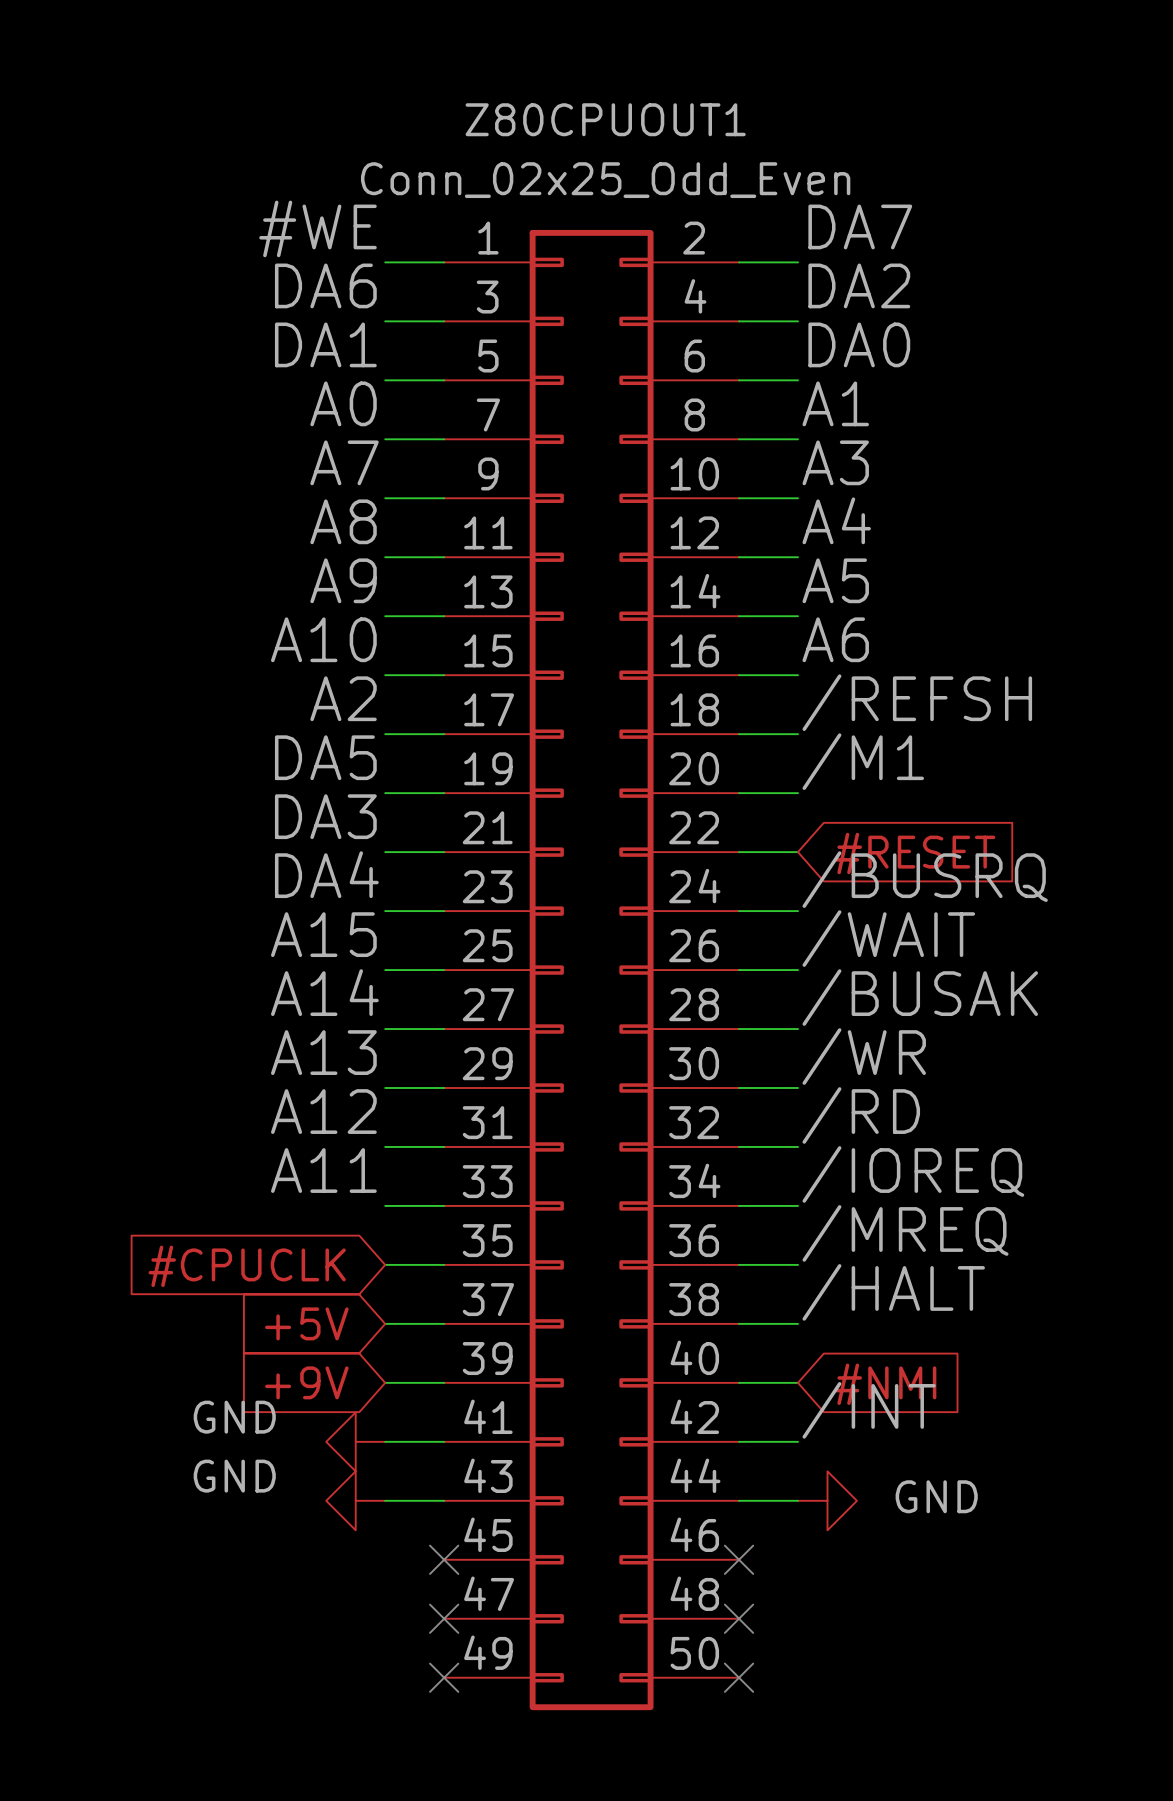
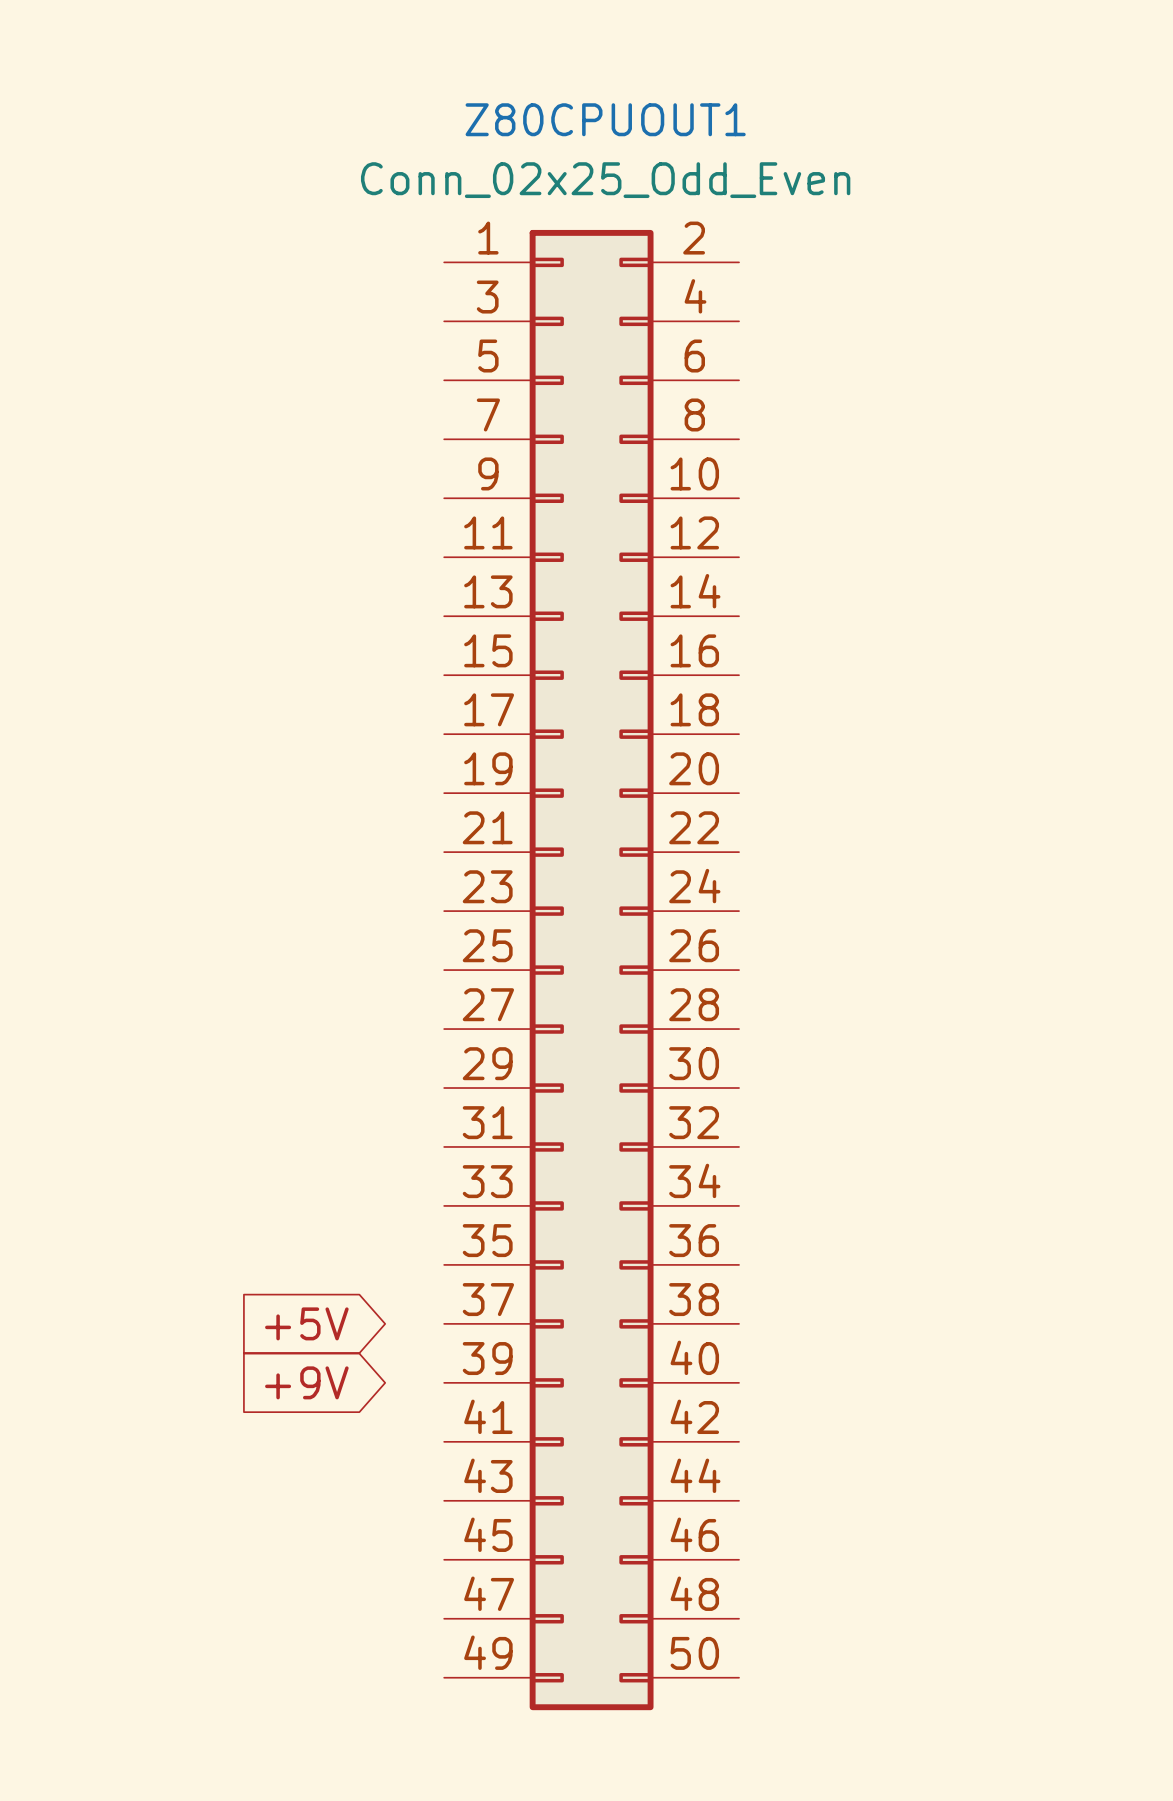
label: DA7 (860, 226) -> none
label: #WE (317, 228) -> none
wire: (385, 262) (444, 262) -> none
wire: (739, 262) (798, 262) -> none
label: DA6 (325, 285) -> none
label: DA2 (859, 285) -> none
wire: (385, 321) (444, 321) -> none
wire: (739, 321) (798, 321) -> none
label: DA1 (325, 344) -> none
label: DA0 (859, 344) -> none
wire: (385, 380) (444, 380) -> none
wire: (739, 380) (798, 380) -> none
label: A0 (343, 403) -> none
label: A1 (835, 403) -> none
wire: (385, 439) (444, 439) -> none
wire: (739, 439) (798, 439) -> none
label: A7 (344, 462) -> none
label: A3 (835, 462) -> none
wire: (385, 498) (444, 498) -> none
wire: (739, 498) (798, 498) -> none
label: A4 (836, 520) -> none
label: A8 (343, 521) -> none
wire: (385, 557) (444, 557) -> none
wire: (739, 557) (798, 557) -> none
label: A9 (343, 580) -> none
label: A5 (835, 580) -> none
wire: (385, 616) (444, 616) -> none
wire: (739, 616) (798, 616) -> none
label: A10 (323, 639) -> none
label: A6 (835, 639) -> none
wire: (385, 675) (444, 675) -> none
wire: (739, 675) (798, 675) -> none
label: A2 (343, 698) -> none
label: /REFSH (917, 702) -> none
wire: (385, 734) (444, 734) -> none
wire: (739, 734) (798, 734) -> none
label: DA5 (325, 757) -> none
label: /M1 (863, 761) -> none
wire: (385, 793) (444, 793) -> none
wire: (739, 793) (798, 793) -> none
label: DA3 (325, 816) -> none
wire: (385, 852) (444, 852) -> none
wire: (739, 852) (798, 852) -> none
global label: #RESET (914, 853) -> none
label: DA4 (326, 874) -> none
label: /BUSRQ (925, 879) -> none
wire: (385, 911) (444, 911) -> none
wire: (739, 911) (798, 911) -> none
label: A15 (323, 934) -> none
label: /WAIT (888, 938) -> none
wire: (385, 970) (444, 970) -> none
wire: (739, 970) (798, 970) -> none
label: A14 (324, 992) -> none
label: /BUSAK (920, 997) -> none
wire: (385, 1029) (444, 1029) -> none
wire: (739, 1029) (798, 1029) -> none
label: A13 (323, 1052) -> none
label: /WR (864, 1056) -> none
wire: (385, 1088) (444, 1088) -> none
wire: (739, 1088) (798, 1088) -> none
label: A12 (323, 1111) -> none
label: /RD (861, 1115) -> none
wire: (385, 1146) (444, 1146) -> none
wire: (739, 1146) (798, 1146) -> none
label: A11 (323, 1170) -> none
label: /IOREQ (913, 1174) -> none
wire: (385, 1205) (444, 1205) -> none
wire: (739, 1205) (798, 1205) -> none
label: /MREQ (905, 1233) -> none
wire: (385, 1264) (444, 1264) -> none
wire: (739, 1264) (798, 1264) -> none
global label: #CPUCLK (247, 1266) -> none
label: /HALT (893, 1292) -> none
wire: (385, 1323) (444, 1323) -> none
wire: (739, 1323) (798, 1323) -> none
wire: (385, 1382) (444, 1382) -> none
wire: (739, 1382) (798, 1382) -> none
global label: #NMI (885, 1384) -> none
label: /INT (869, 1410) -> none
power symbol: GND (355, 1441) -> none
wire: (385, 1441) (444, 1441) -> none
wire: (739, 1441) (798, 1441) -> none
power symbol: GND (355, 1500) -> none
wire: (385, 1500) (444, 1500) -> none
wire: (739, 1500) (798, 1500) -> none
power symbol: GND (827, 1500) -> none
no-connect mark: (444, 1559) -> none
no-connect mark: (739, 1559) -> none
no-connect mark: (444, 1618) -> none
no-connect mark: (739, 1618) -> none
no-connect mark: (444, 1677) -> none
no-connect mark: (739, 1677) -> none

